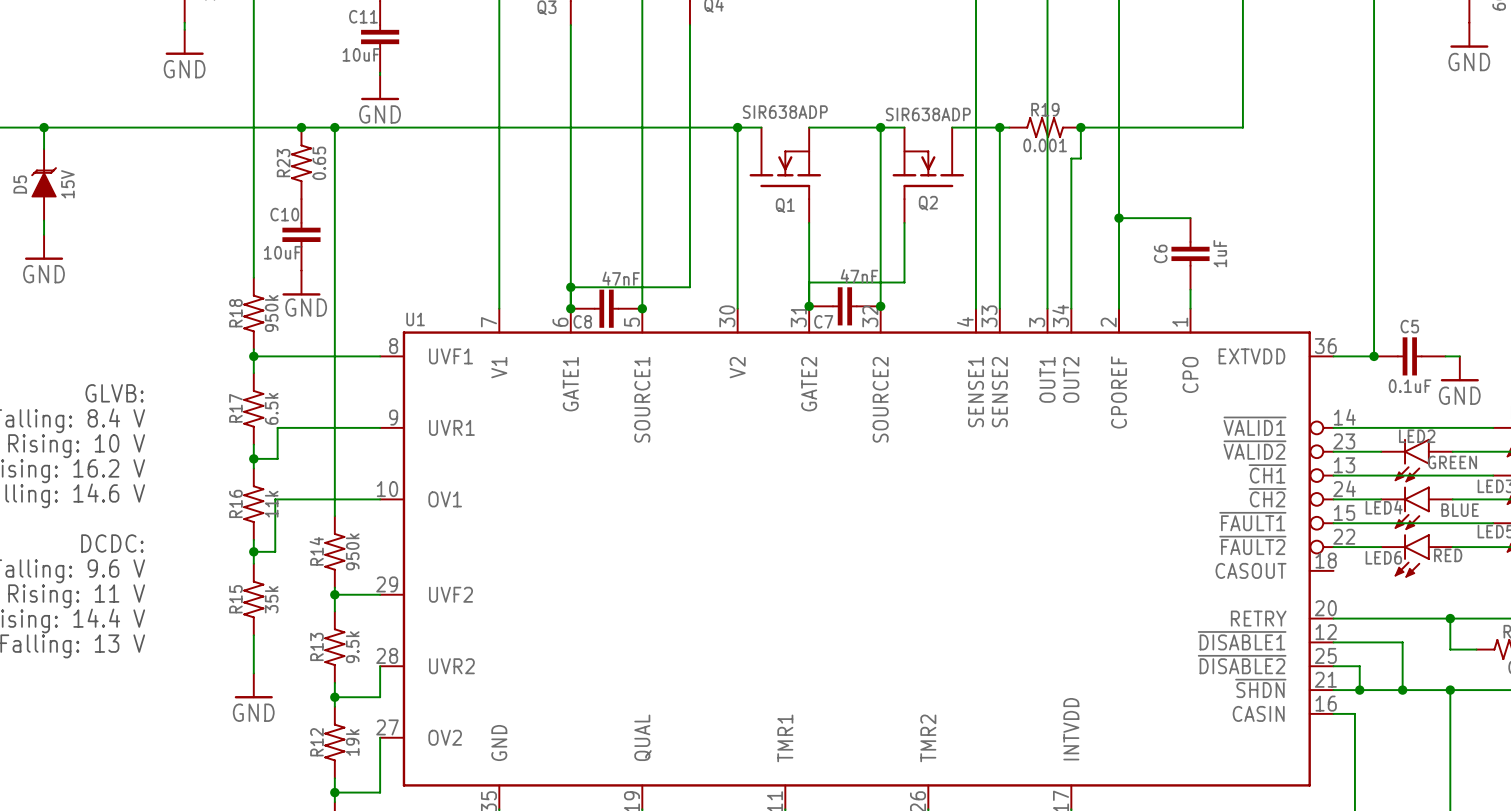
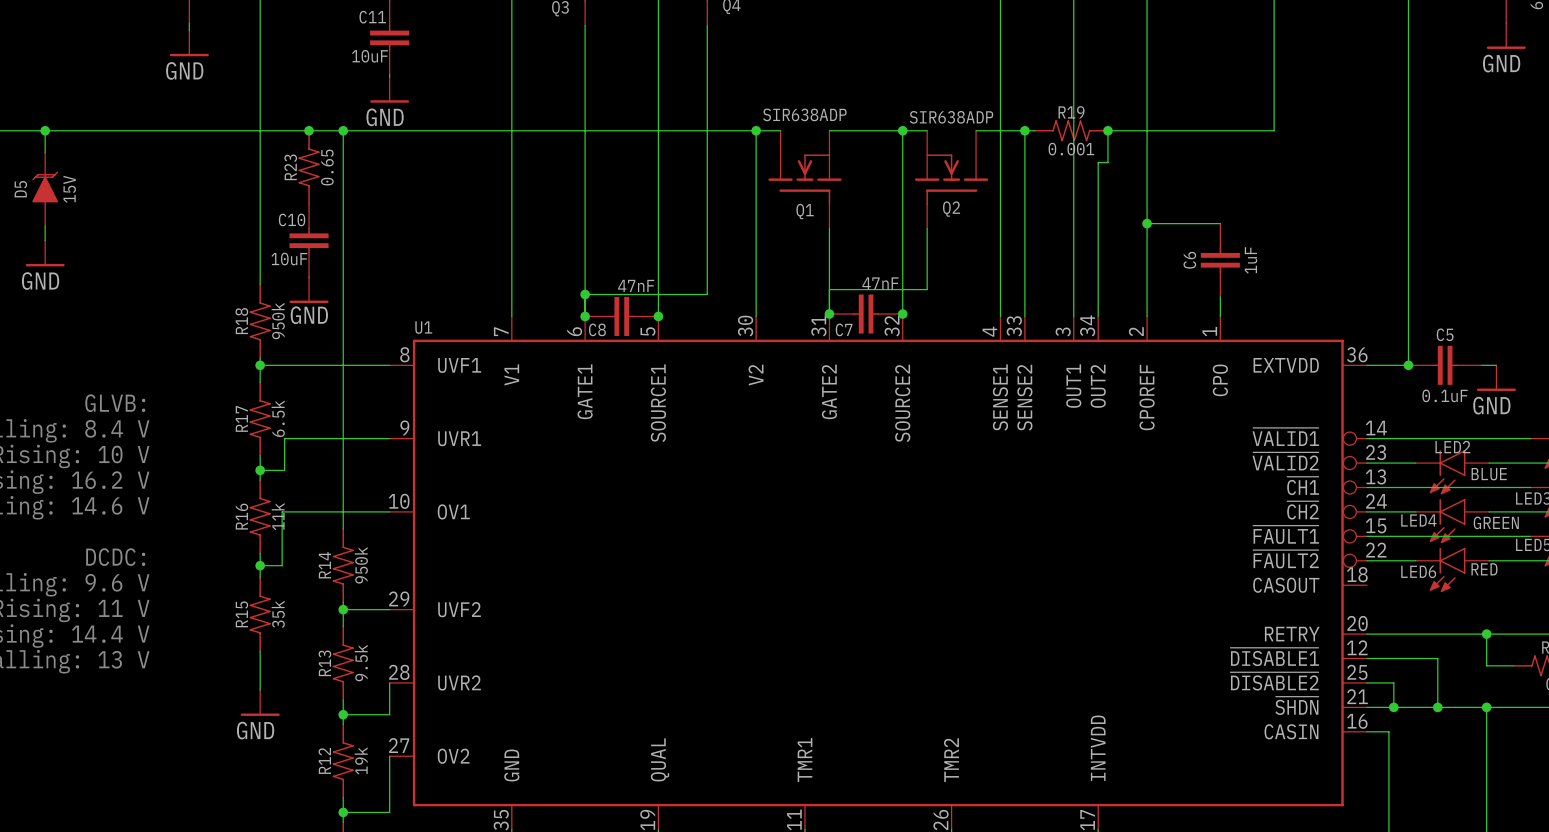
LED2 value: GREEN (1452, 462) -> BLUE (1489, 474)
LED4 value: BLUE (1460, 510) -> GREEN (1496, 522)

